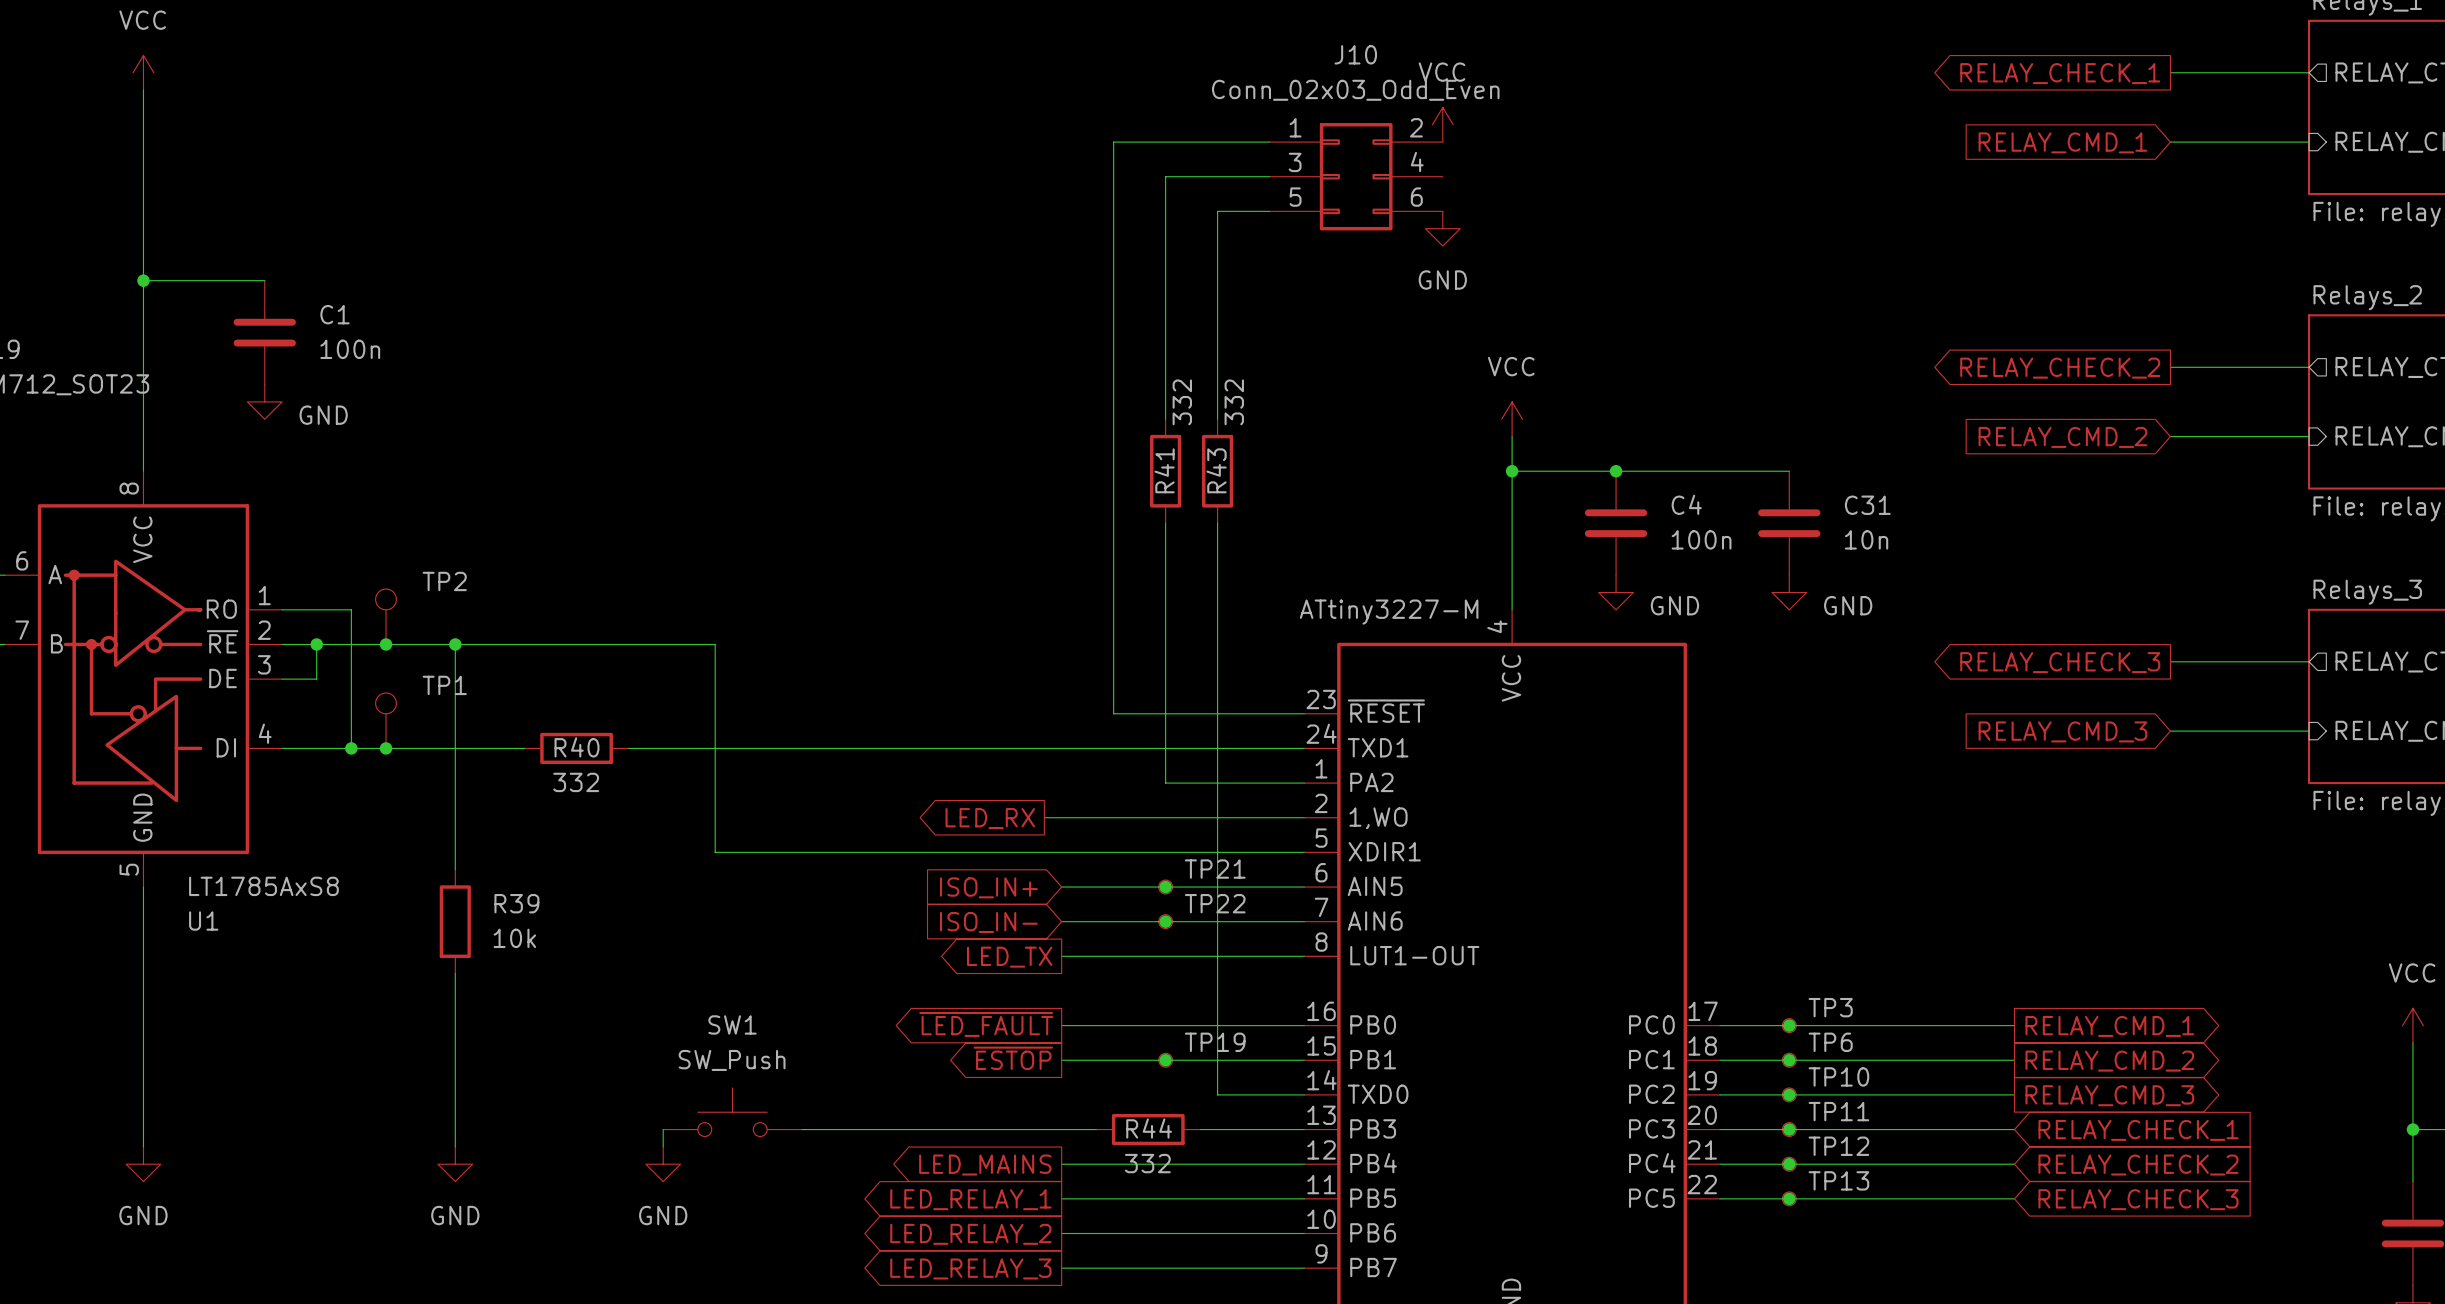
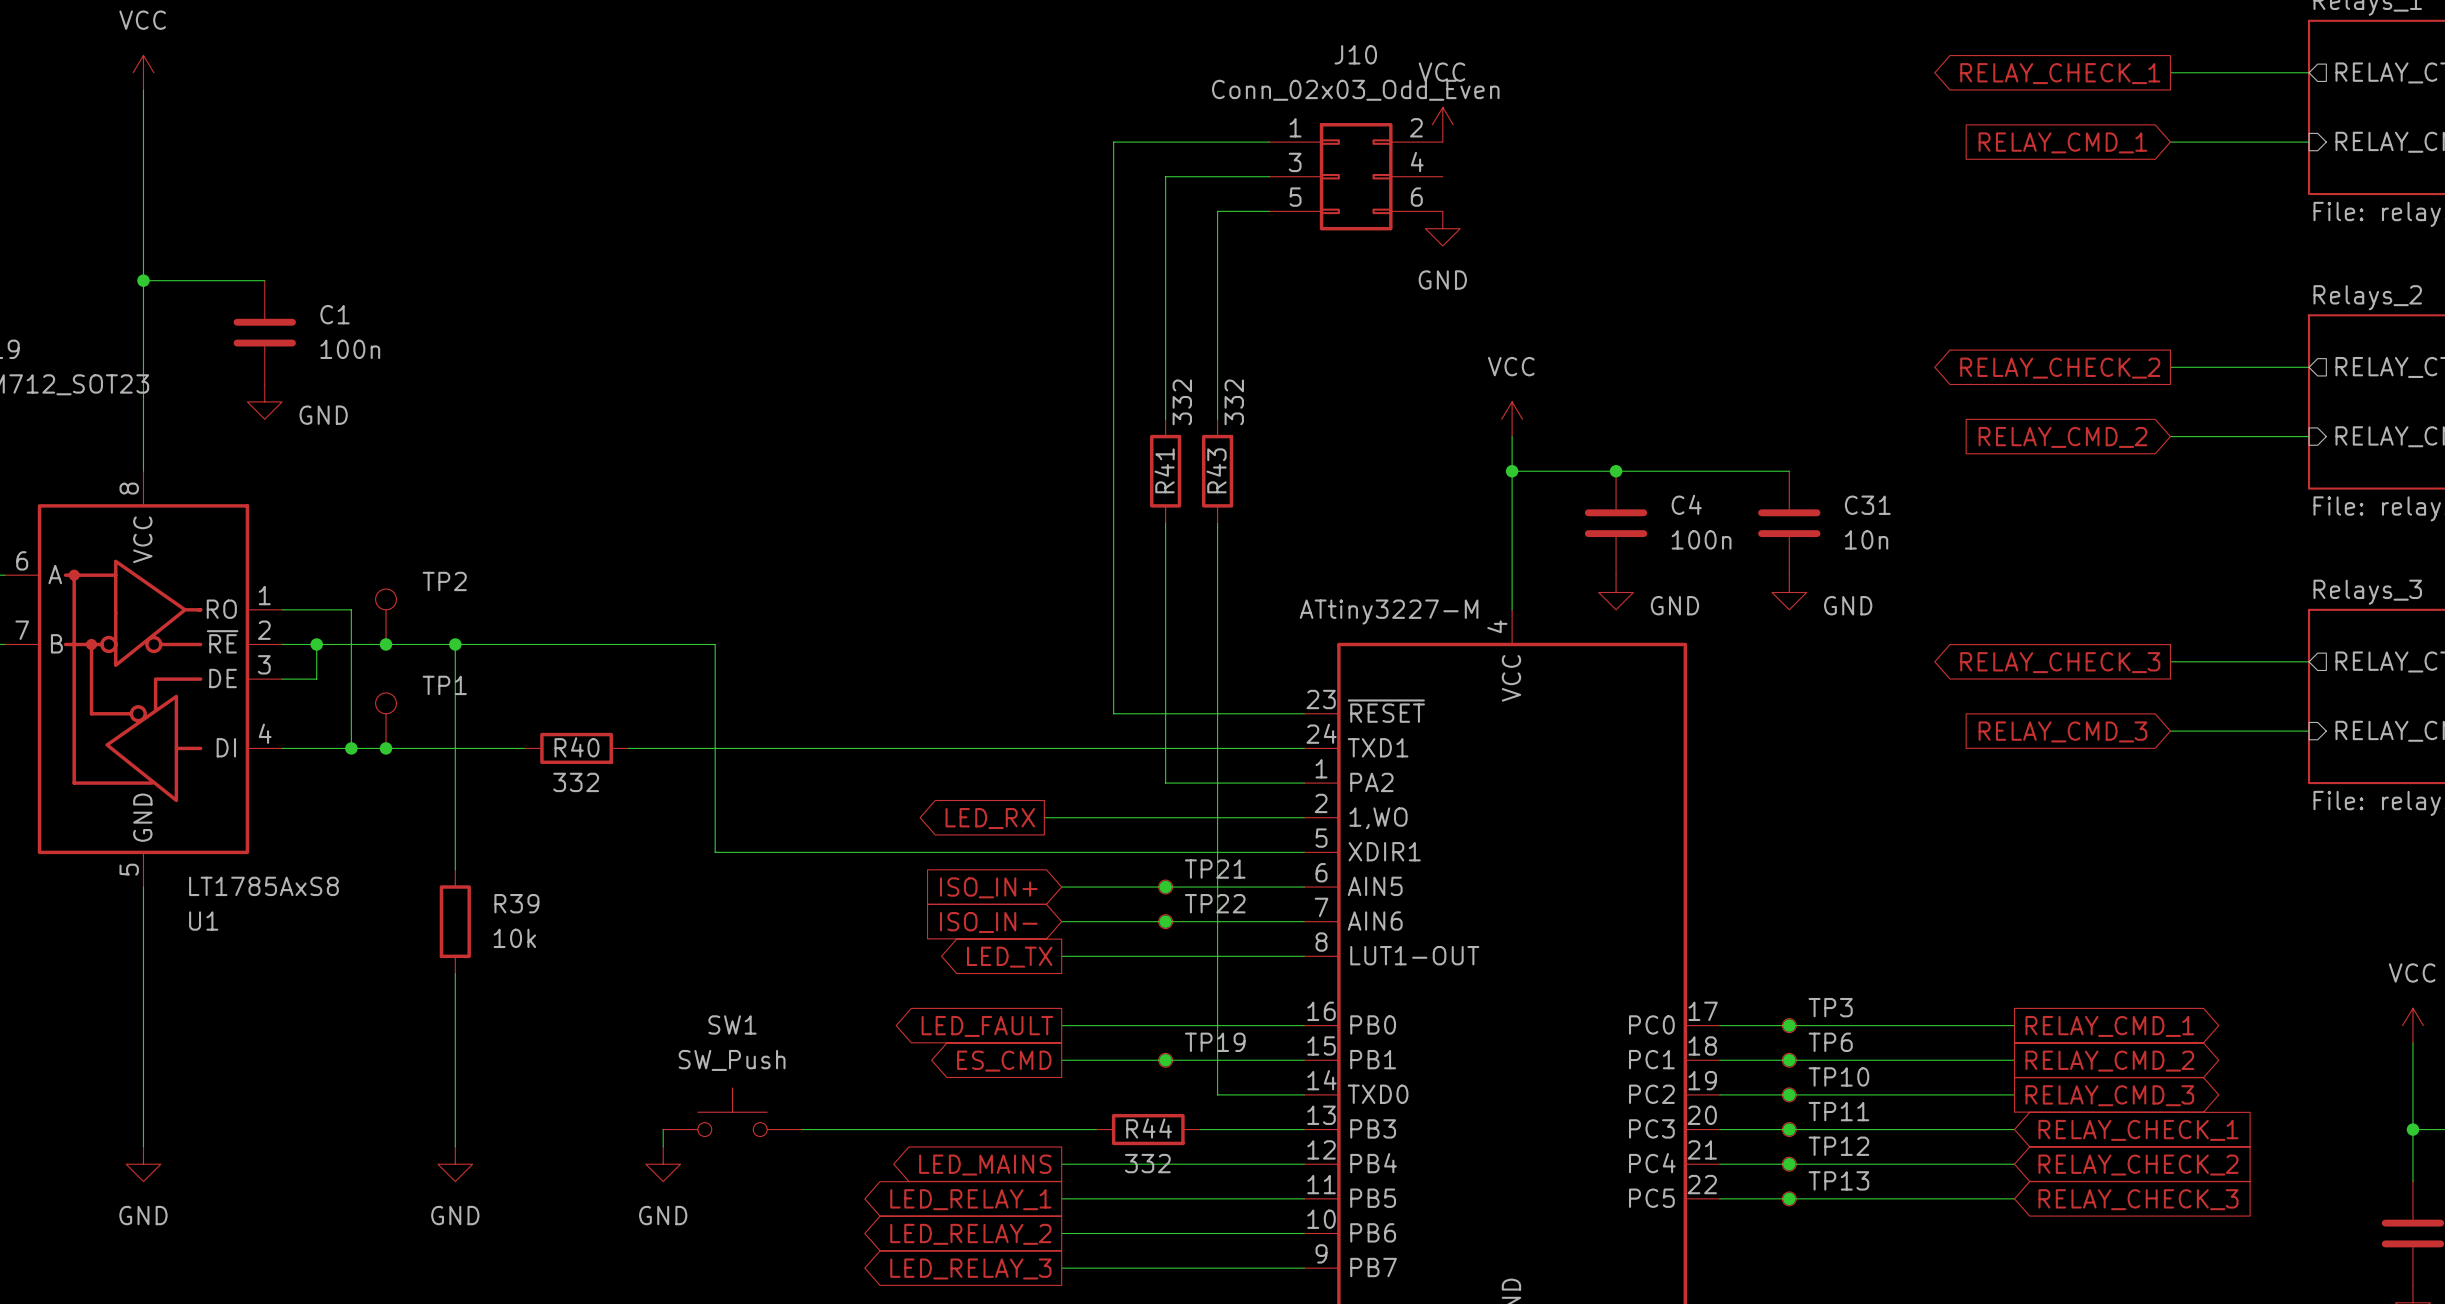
global label: ~{LED_FAULT} (986, 1024) -> LED_FAULT (987, 1026)
global label: ~{ESTOP} (1013, 1058) -> ES_CMD (1004, 1061)

